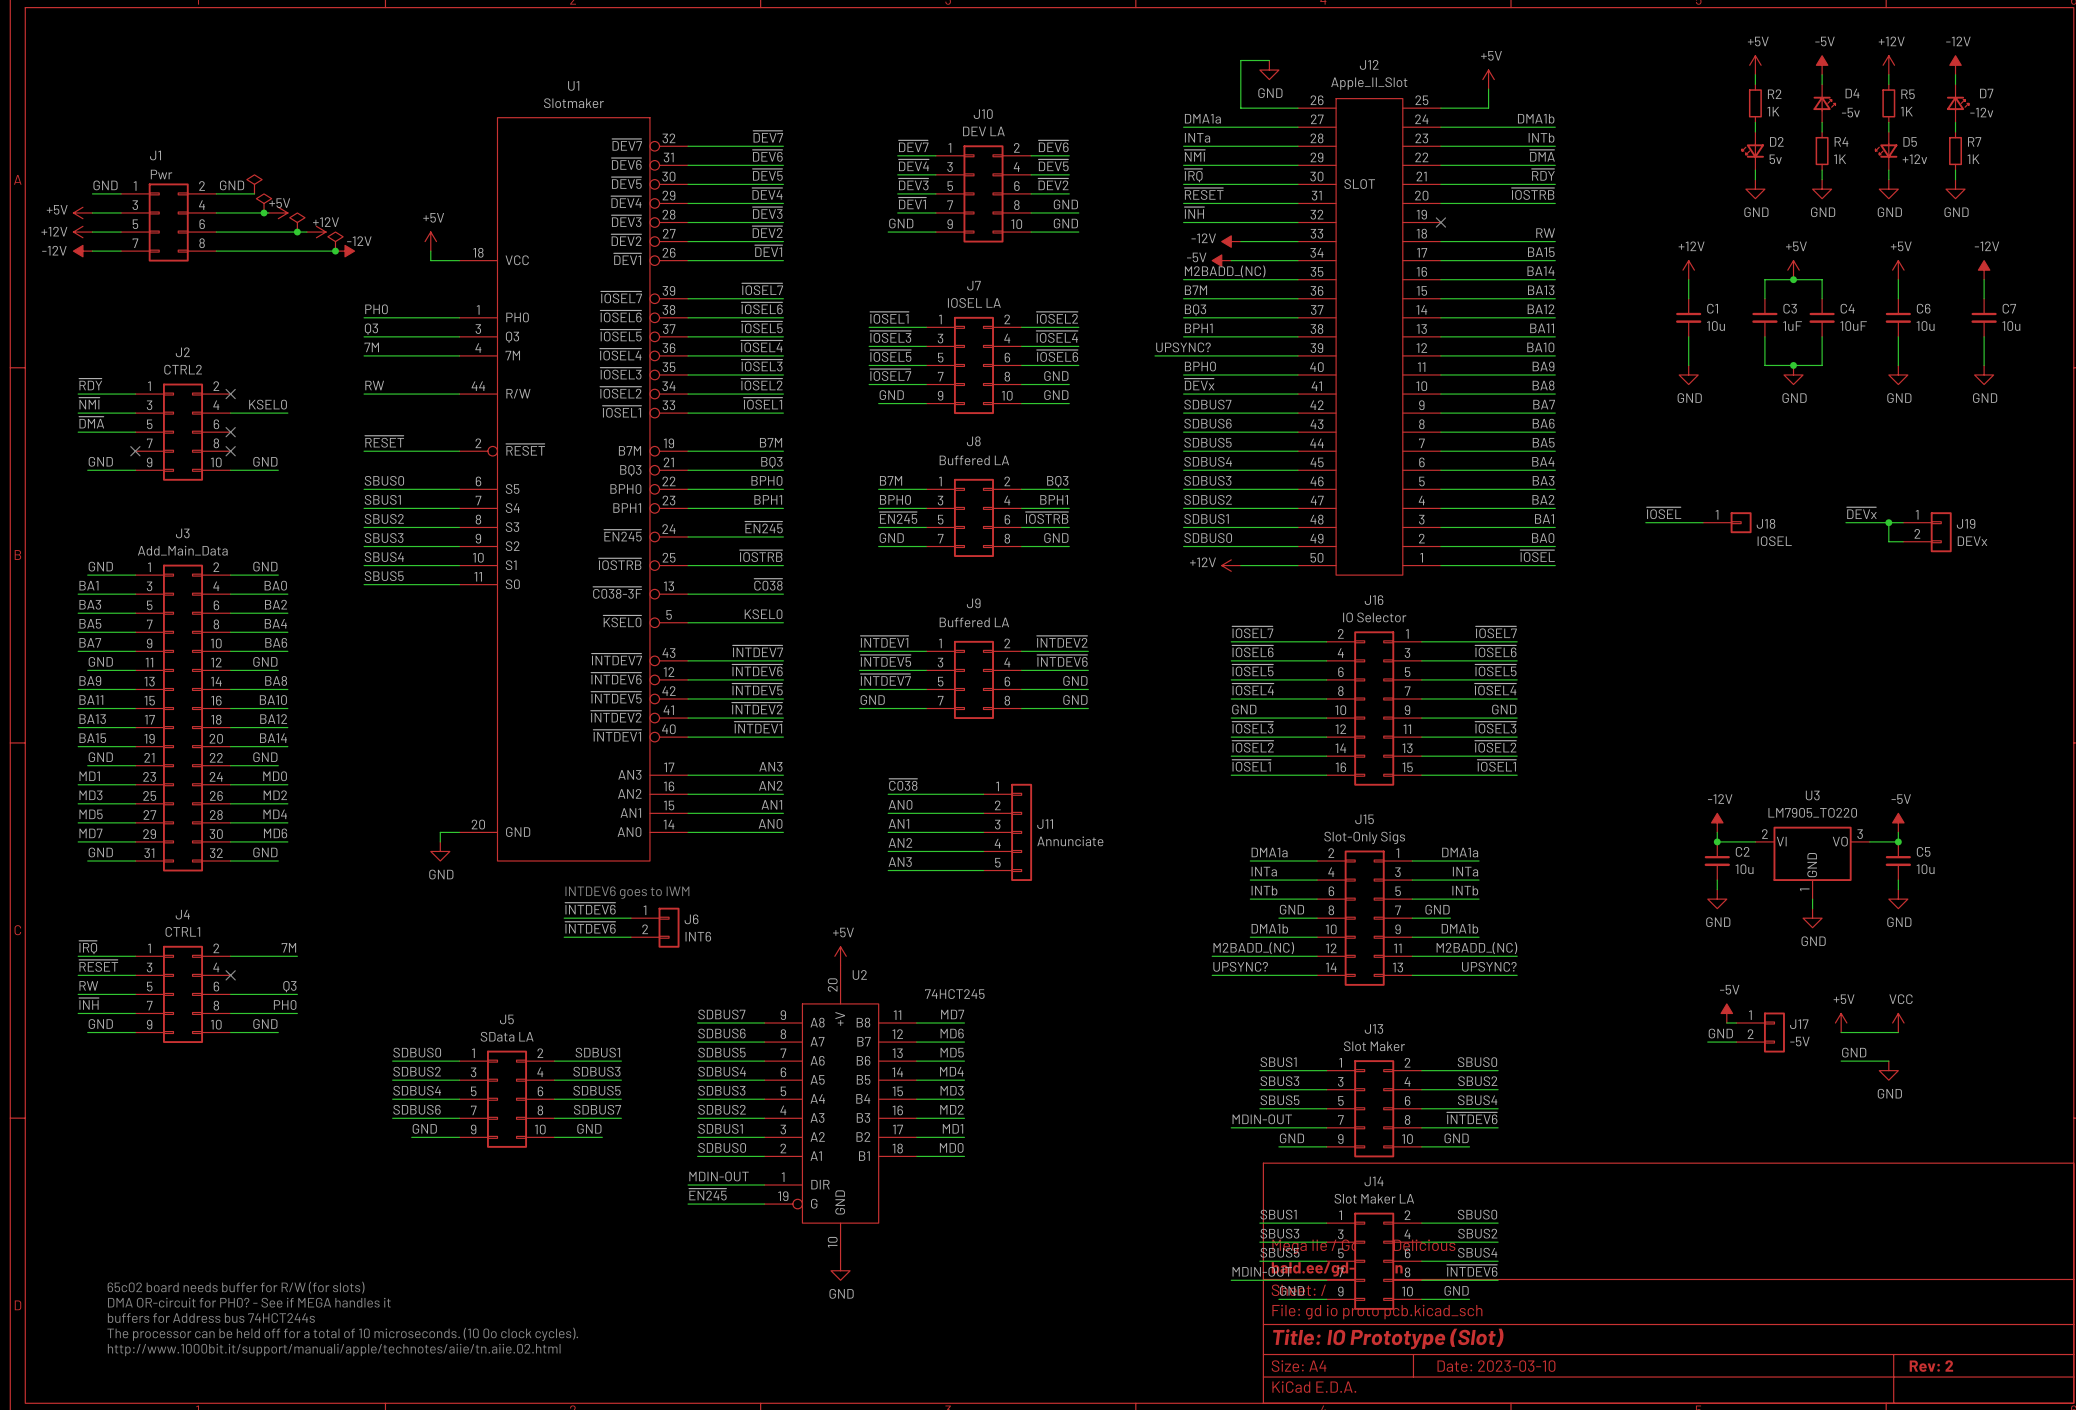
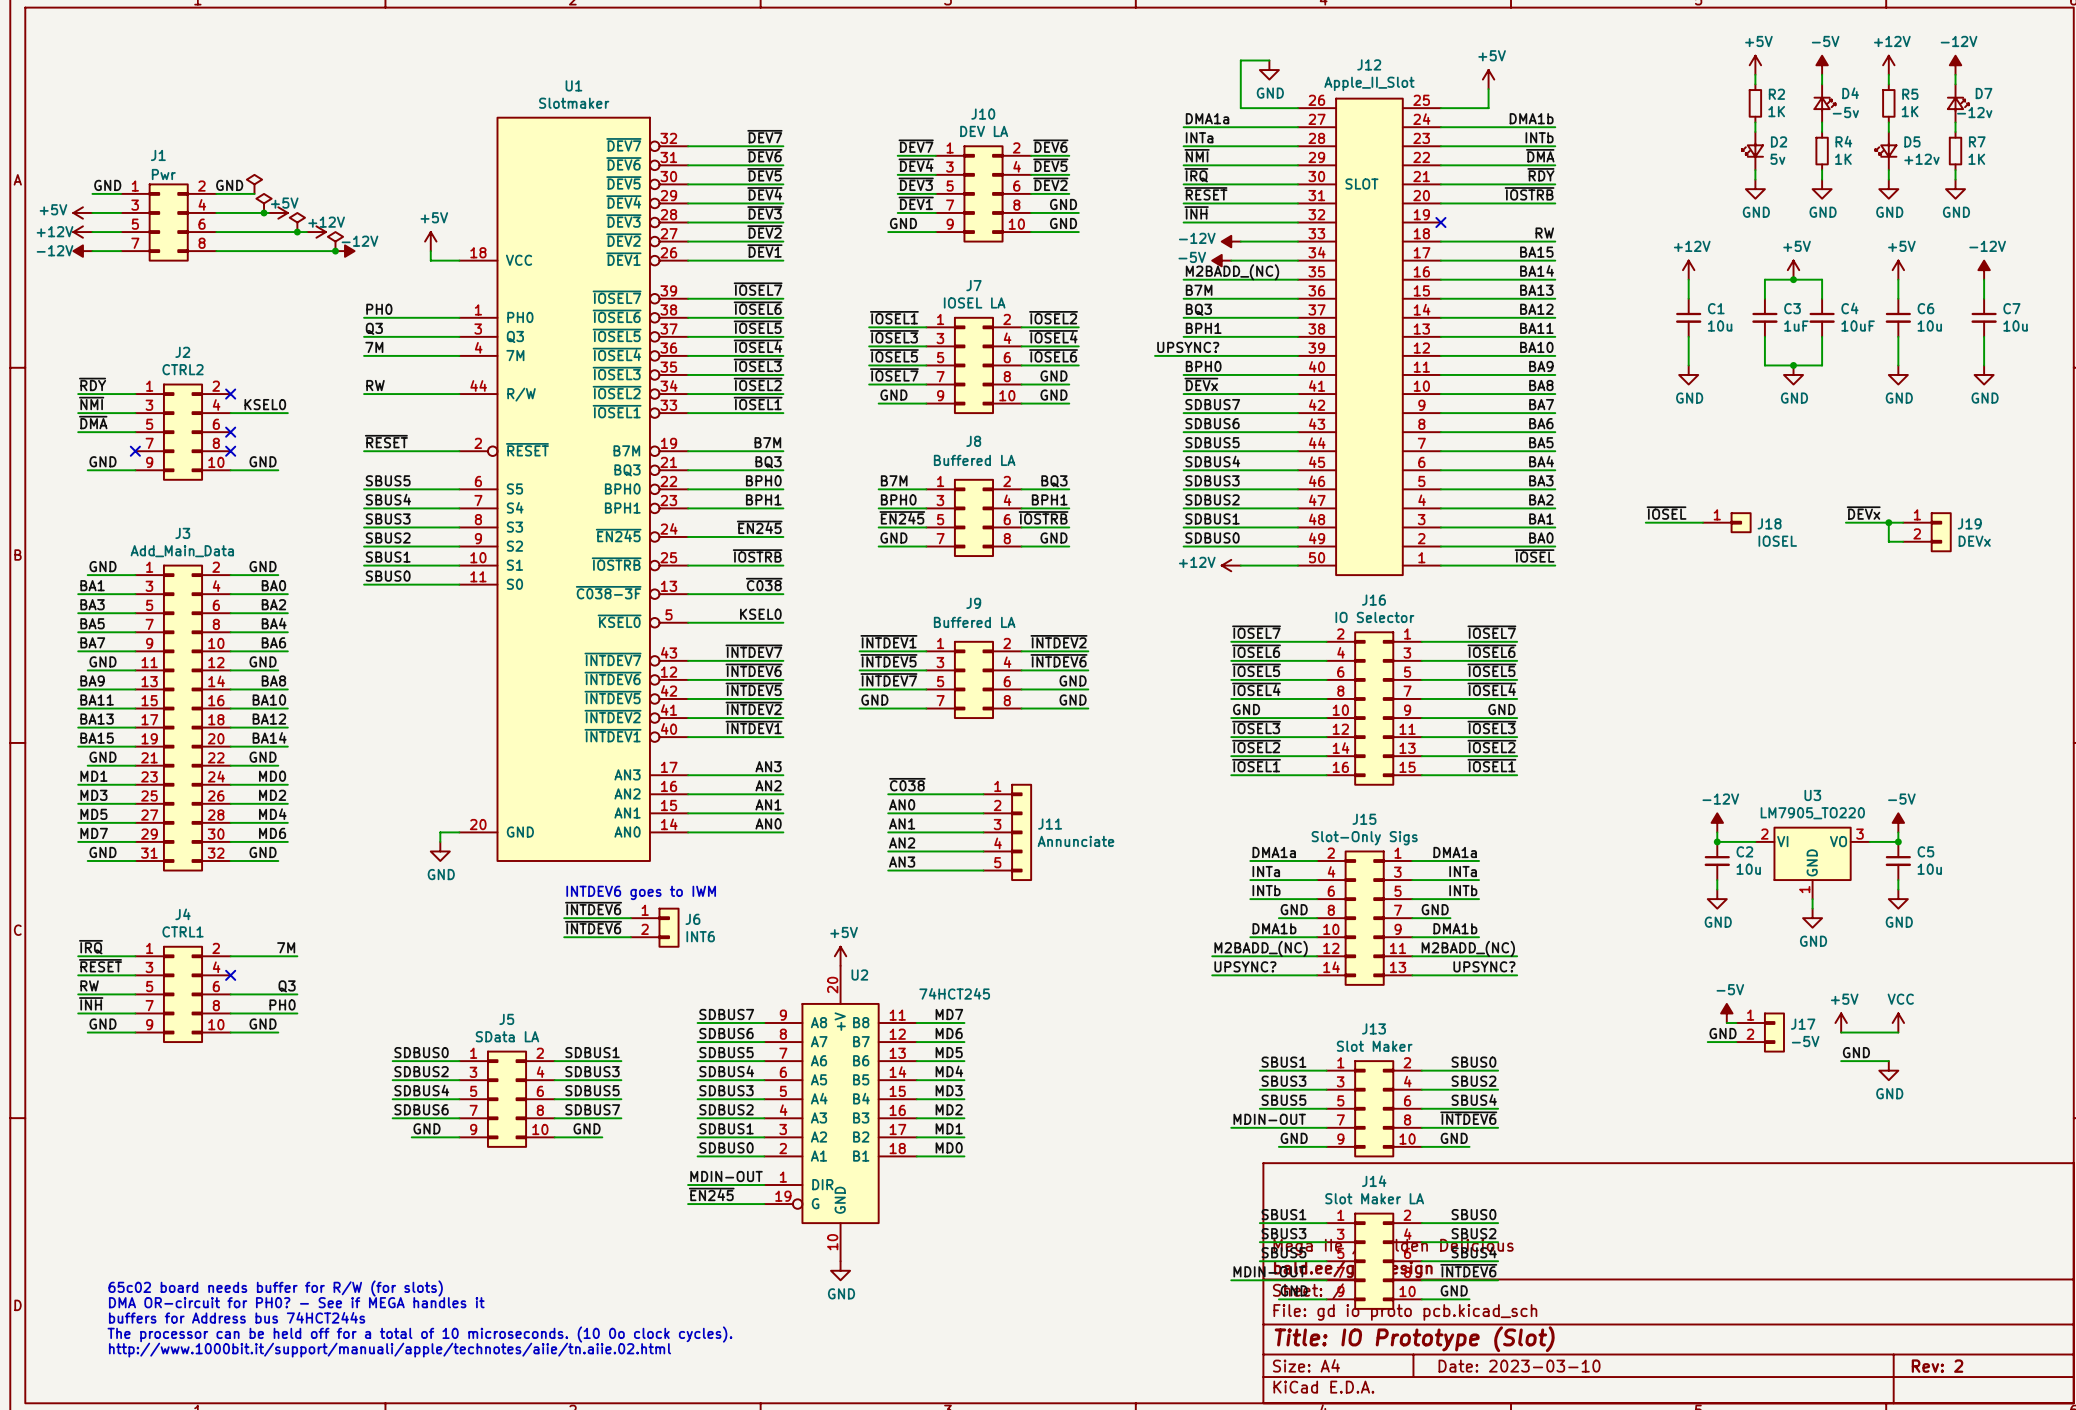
label: SBUS0 (384, 480) -> SBUS5 (388, 480)
label: SBUS1 (382, 499) -> SBUS4 (388, 499)
label: SBUS2 (384, 518) -> SBUS3 (388, 518)
label: SBUS3 (384, 538) -> SBUS2 (388, 538)
label: SBUS4 (384, 557) -> SBUS1 (388, 557)
label: SBUS5 (384, 576) -> SBUS0 (388, 576)

